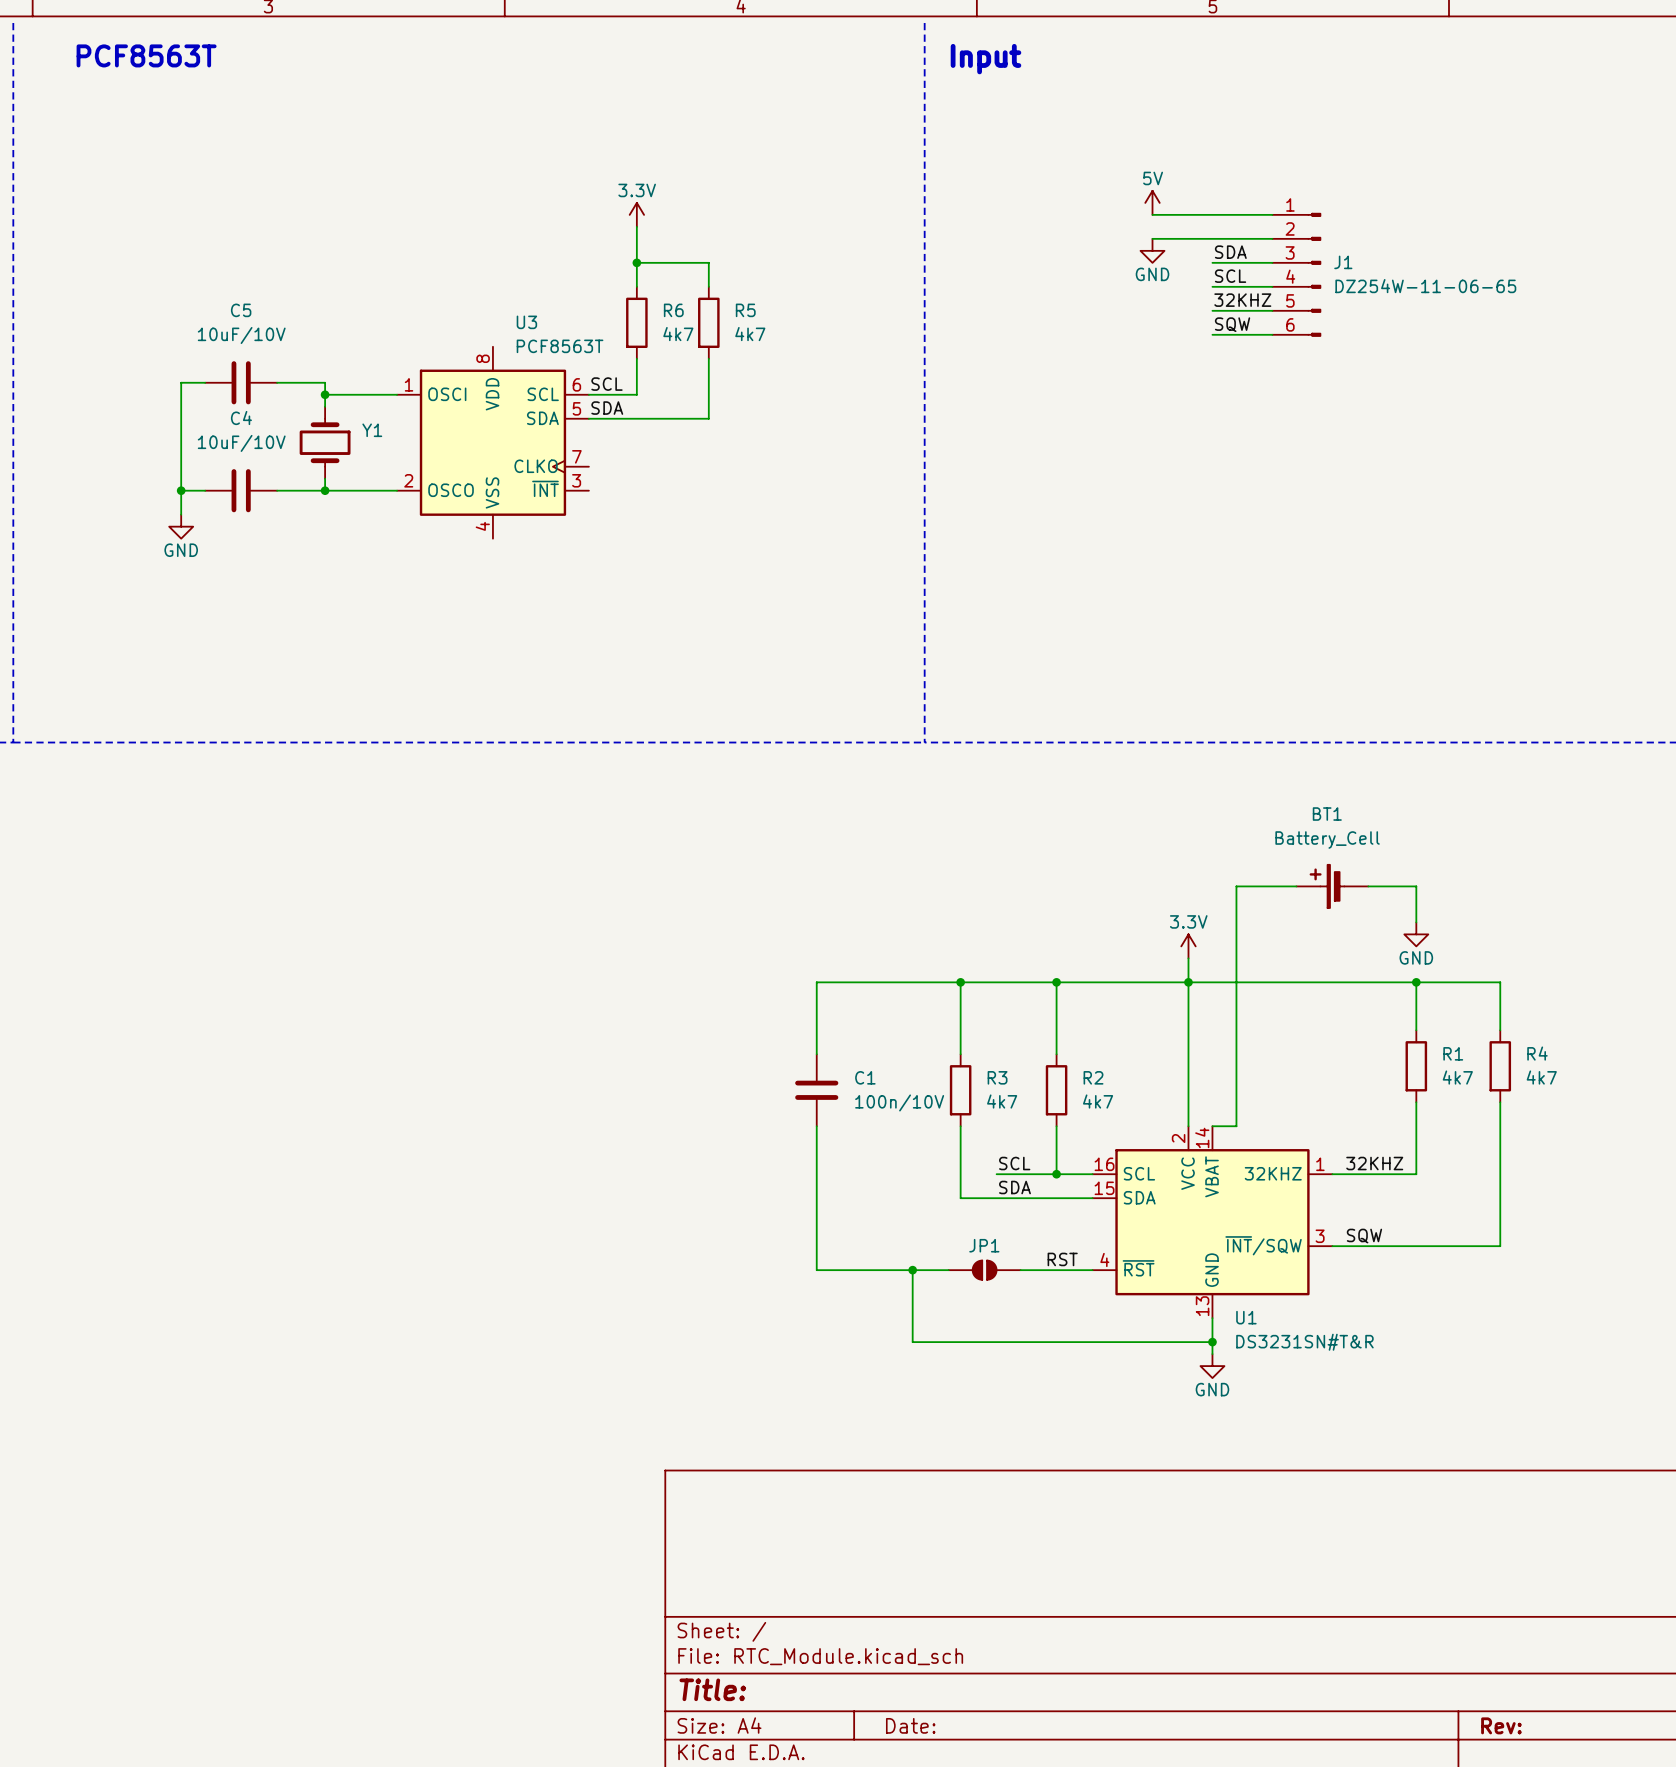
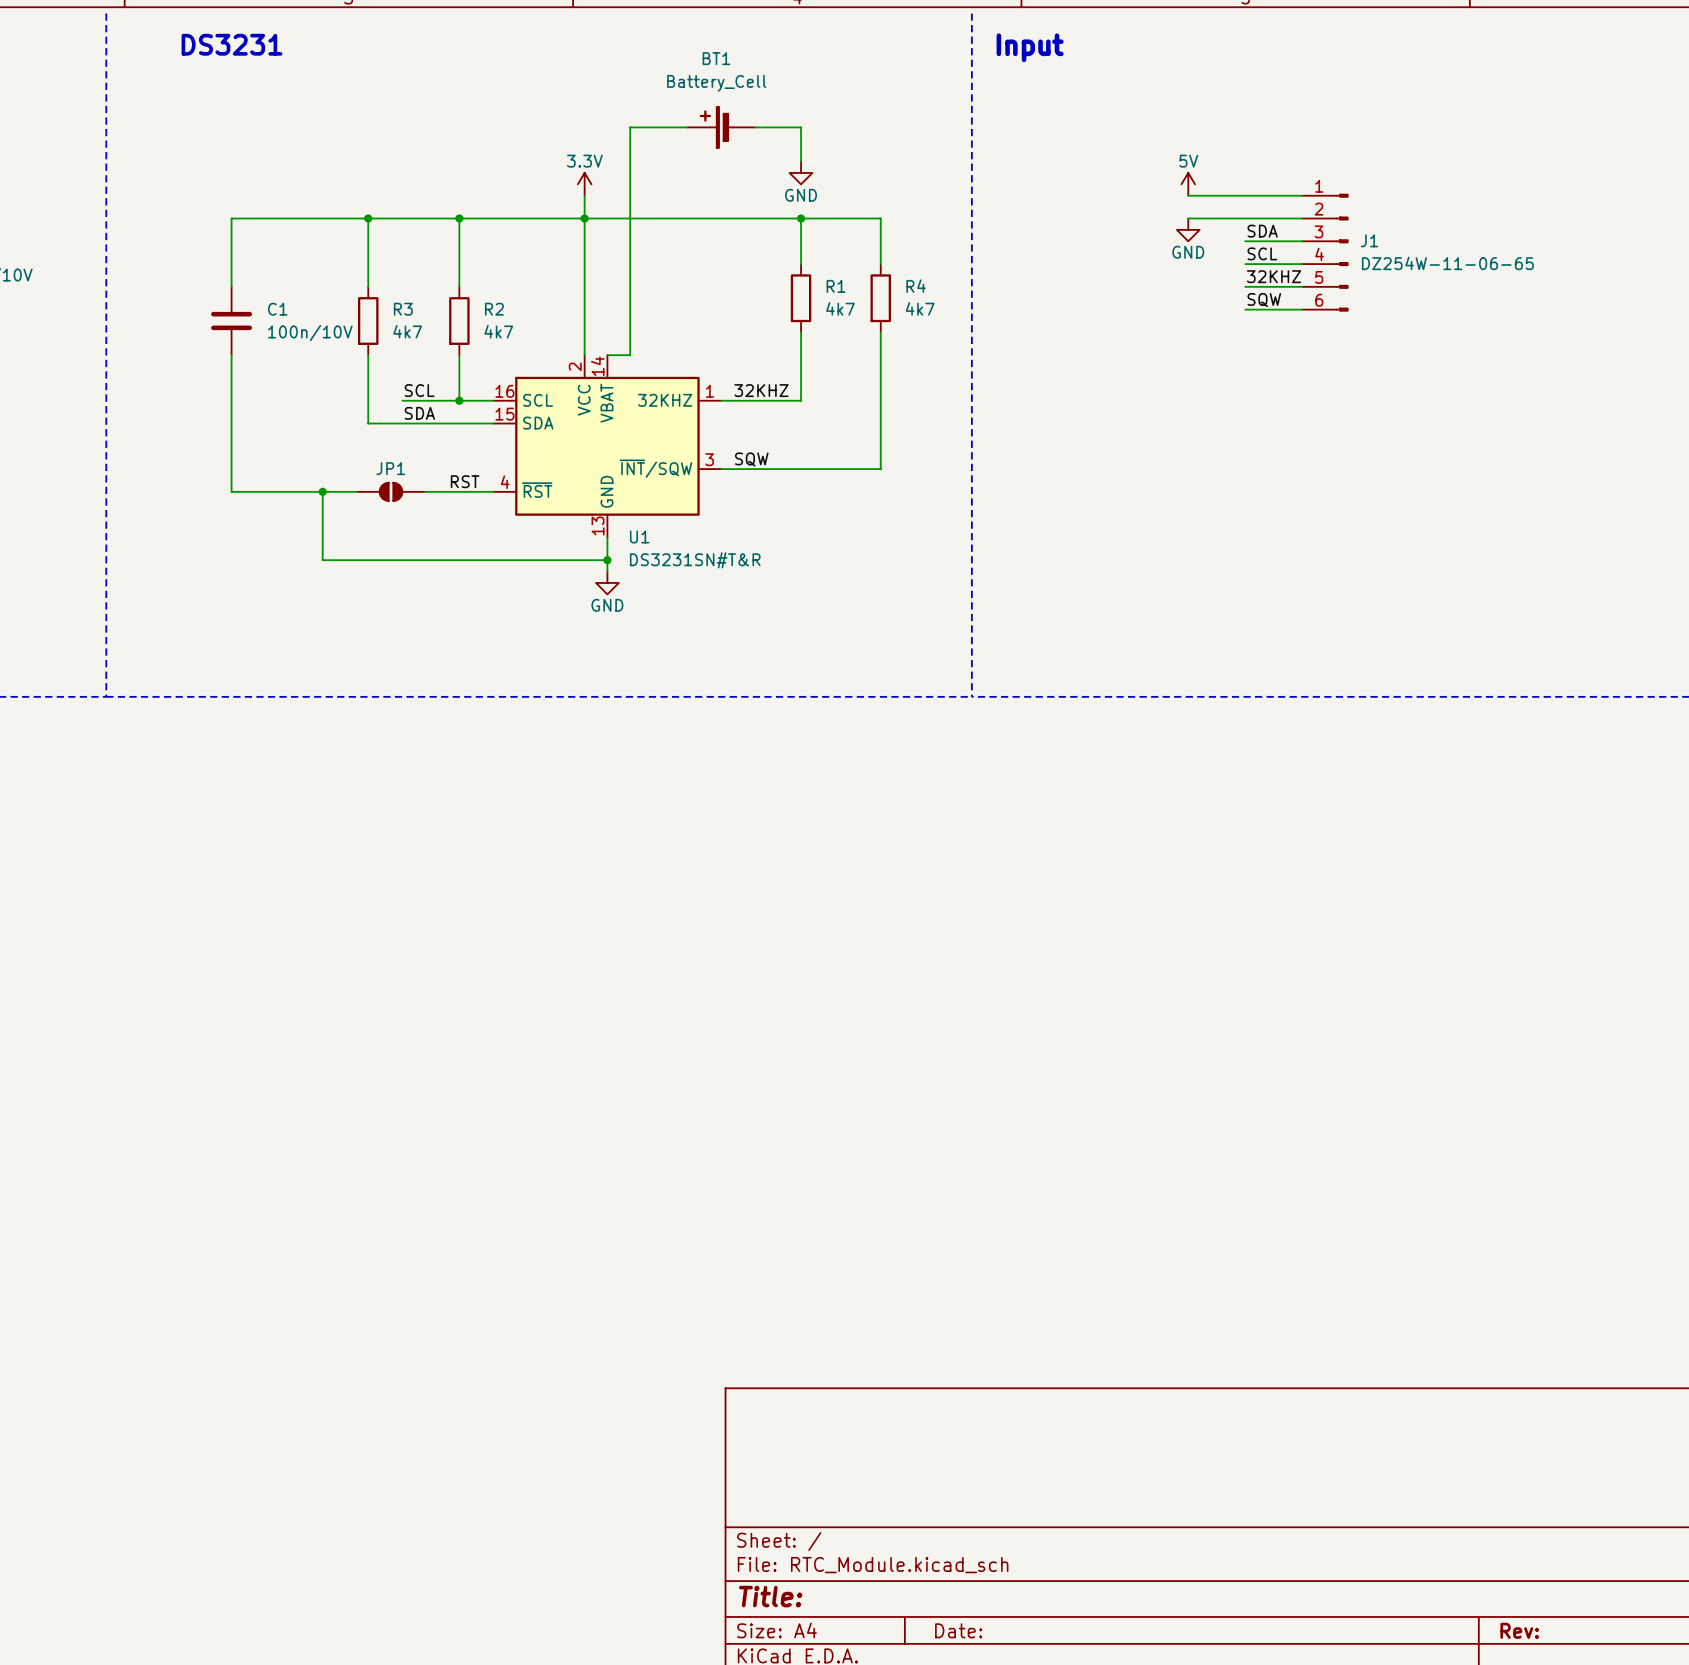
text: PCF8563T (146, 55) -> DS3231 (232, 44)
wire: none -> (687, 127) (630, 127) (630, 355) (607, 355)
wire: none -> (755, 127) (801, 127) (801, 161)
power symbol: none -> GND (801, 172)
wire: none -> (584, 195) (584, 355)
power symbol position: 3.3V (636, 214) -> 3.3V (584, 184)
wire: (636, 226) (636, 286) -> none
wire: none -> (368, 218) (368, 286)
junction: none -> (368, 218)
wire: none -> (459, 218) (459, 286)
junction: none -> (459, 218)
junction: none -> (584, 218)
wire: none -> (801, 218) (801, 264)
junction: none -> (801, 218)
wire: (636, 262) (708, 262) (708, 286) -> none
junction: (636, 262) -> none
wire: none -> (880, 264) (880, 218) (231, 218) (231, 286)
R6: 4k7 (636, 322) -> none
R5: 4k7 (708, 322) -> none
wire: (636, 358) (636, 394) (588, 394) -> none
wire: (708, 358) (708, 418) (588, 418) -> none
wire: none -> (801, 332) (801, 400) (721, 400)
wire: none -> (880, 332) (880, 469) (721, 469)
wire: none -> (231, 355) (231, 491) (356, 491)
wire: (205, 382) (181, 382) (181, 514) -> none
C5: 10uF/10V (241, 382) -> none
wire: (277, 382) (325, 382) (325, 406) -> none
wire: none -> (368, 355) (368, 423) (493, 423)
wire: none -> (459, 355) (459, 400)
label: SCL (606, 384) -> none
wire: (325, 394) (397, 394) -> (425, 491) (493, 491)
junction: (325, 394) -> none
label: SDA (607, 408) -> none
label: none -> SCL (419, 390)
label: none -> 32KHZ (761, 390)
wire: none -> (402, 400) (493, 400)
junction: none -> (459, 400)
Y1: (325, 442) -> none
U3: PCF8563T (492, 442) -> none
label: none -> SDA (419, 413)
wire: (325, 478) (325, 490) -> none
wire: (181, 490) (205, 490) -> none
junction: (181, 490) -> none
C4: 10uF/10V (241, 490) -> none
wire: (277, 490) (397, 490) -> none
junction: (325, 490) -> none
label: none -> SQW (751, 459)
label: none -> RST (465, 481)
power symbol: GND (181, 526) -> none
wire: none -> (322, 491) (322, 560) (607, 560)
junction: none -> (322, 491)
wire: none -> (607, 537) (607, 571)
junction: none -> (607, 560)
power symbol: none -> GND (607, 582)
wire: (1296, 886) (1236, 886) (1236, 1126) (1212, 1126) -> none
BT1 position: (1332, 886) -> (721, 127)
wire: (1368, 886) (1416, 886) (1416, 922) -> none
power symbol: GND (1416, 934) -> none
power symbol: 3.3V (1188, 946) -> none
wire: (1188, 958) (1188, 1126) -> none
wire: (960, 982) (960, 1054) -> none
junction: (960, 982) -> none
wire: (1056, 982) (1056, 1054) -> none
junction: (1056, 982) -> none
junction: (1188, 982) -> none
wire: (1416, 982) (1416, 1030) -> none
junction: (1416, 982) -> none
wire: (1500, 1030) (1500, 982) (816, 982) (816, 1054) -> none
R1 position: (1416, 1066) -> (801, 298)
R4 position: (1500, 1066) -> (880, 298)
C1 position: (816, 1090) -> (231, 321)
R3 position: (960, 1090) -> (368, 321)
R2 position: (1056, 1090) -> (459, 321)
wire: (1416, 1102) (1416, 1174) (1332, 1174) -> none
wire: (1500, 1102) (1500, 1246) (1332, 1246) -> none
wire: (816, 1126) (816, 1270) (948, 1270) -> none
wire: (960, 1126) (960, 1198) (1092, 1198) -> none
wire: (1056, 1126) (1056, 1174) -> none
label: SCL (1014, 1163) -> none
label: 32KHZ (1374, 1163) -> none
wire: (996, 1174) (1092, 1174) -> none
junction: (1056, 1174) -> none
label: SDA (1014, 1187) -> none
U1 position: (1212, 1222) -> (607, 446)
label: SQW (1364, 1236) -> none
label: RST (1062, 1259) -> none
wire: (912, 1270) (912, 1342) (1212, 1342) -> none
junction: (912, 1270) -> none
JP1 position: (984, 1270) -> (391, 491)
wire: (1020, 1270) (1092, 1270) -> none
wire: (1212, 1318) (1212, 1354) -> none
junction: (1212, 1342) -> none
power symbol: GND (1212, 1366) -> none

